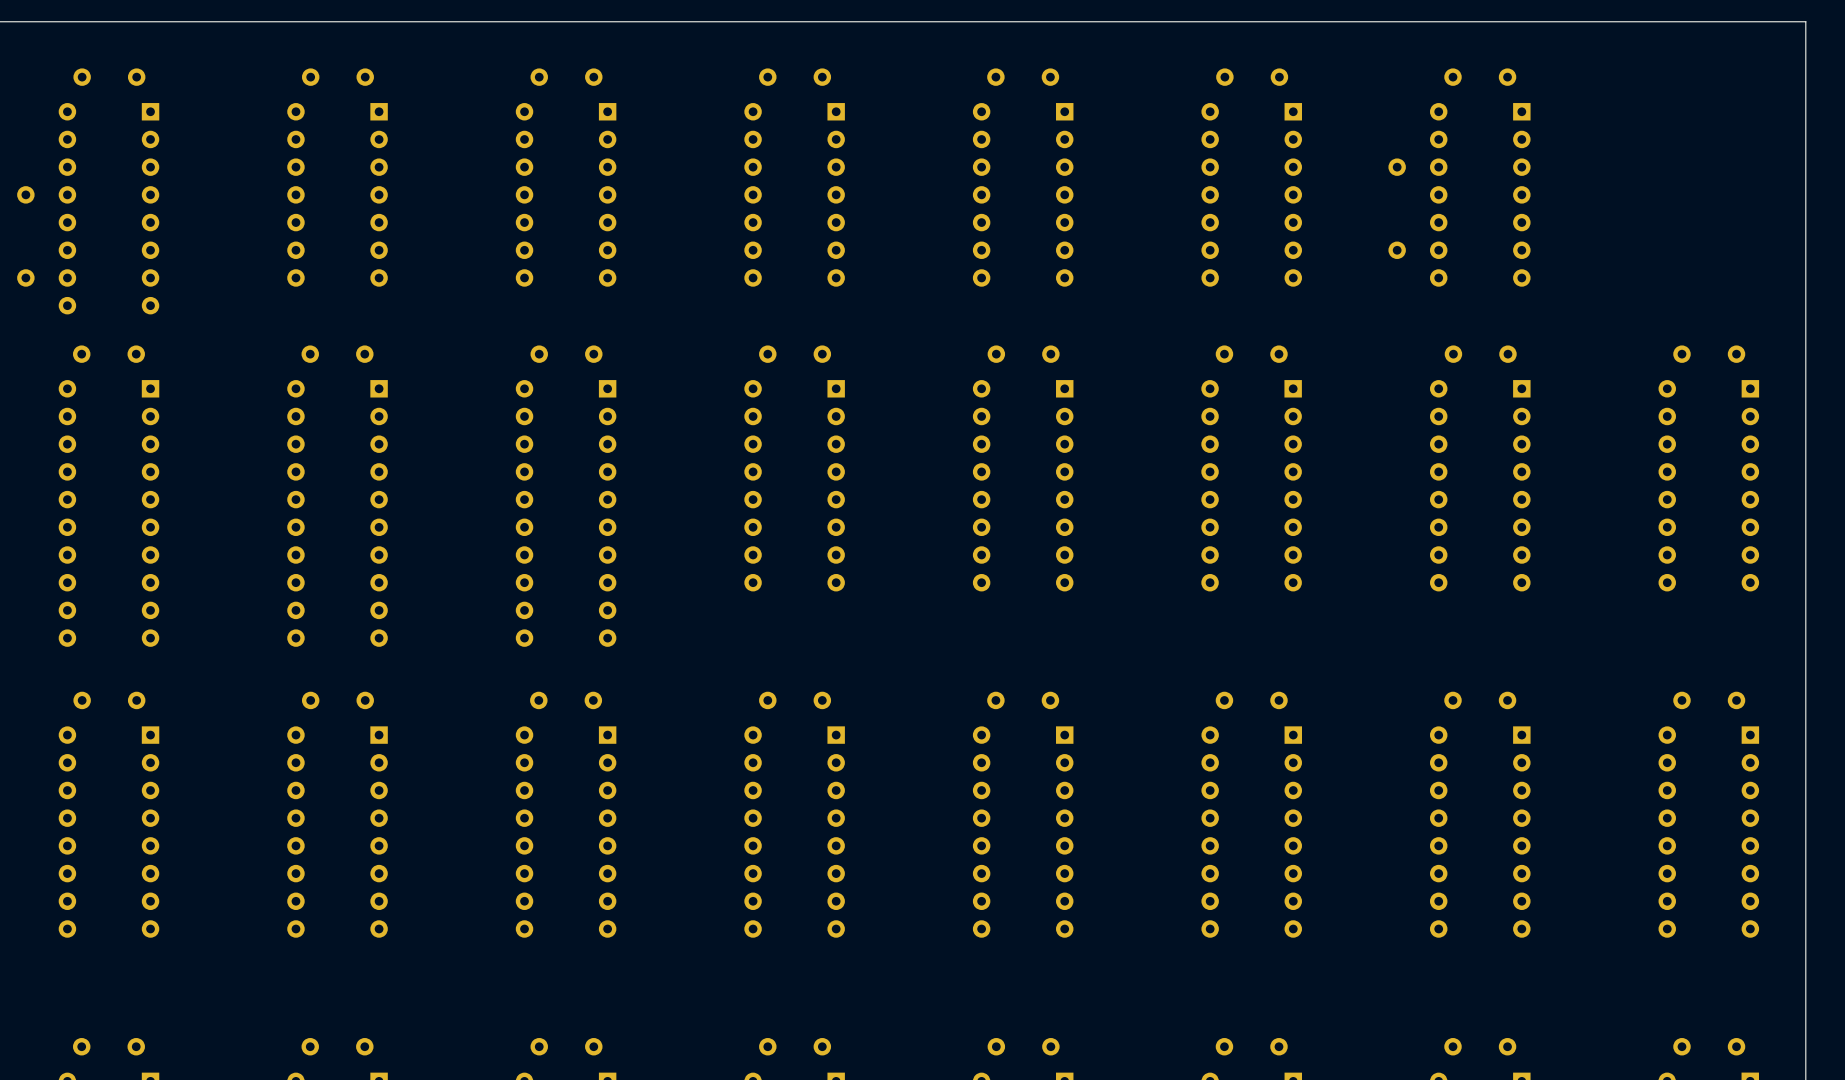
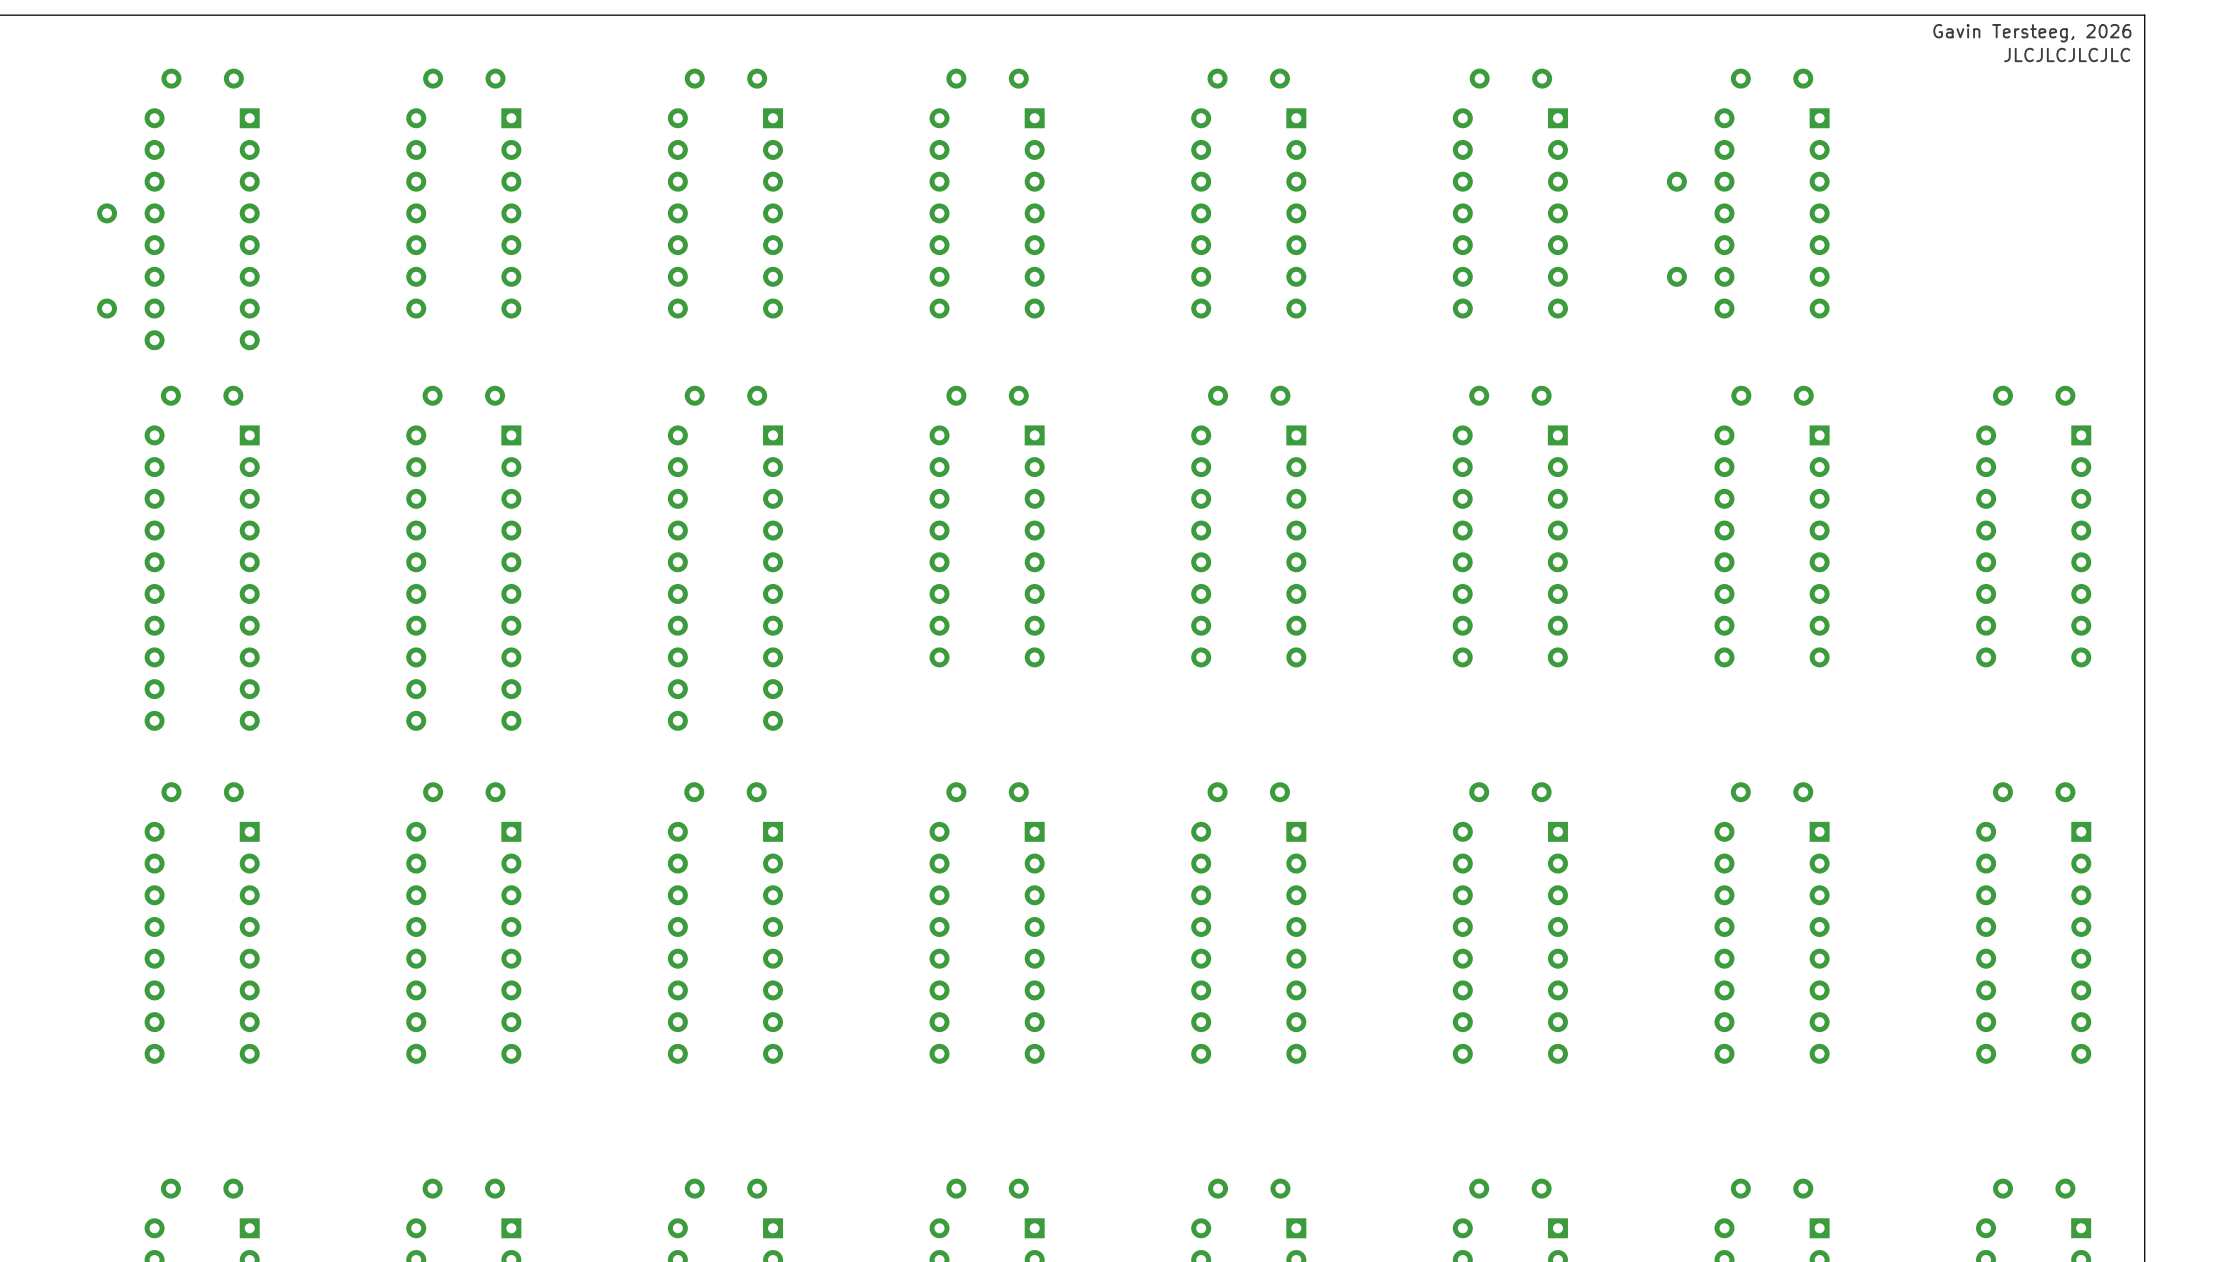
text: none -> Gavin Tersteeg, 2026 (2032, 33)
text: none -> JLCJLCJLCJLC (2067, 54)

